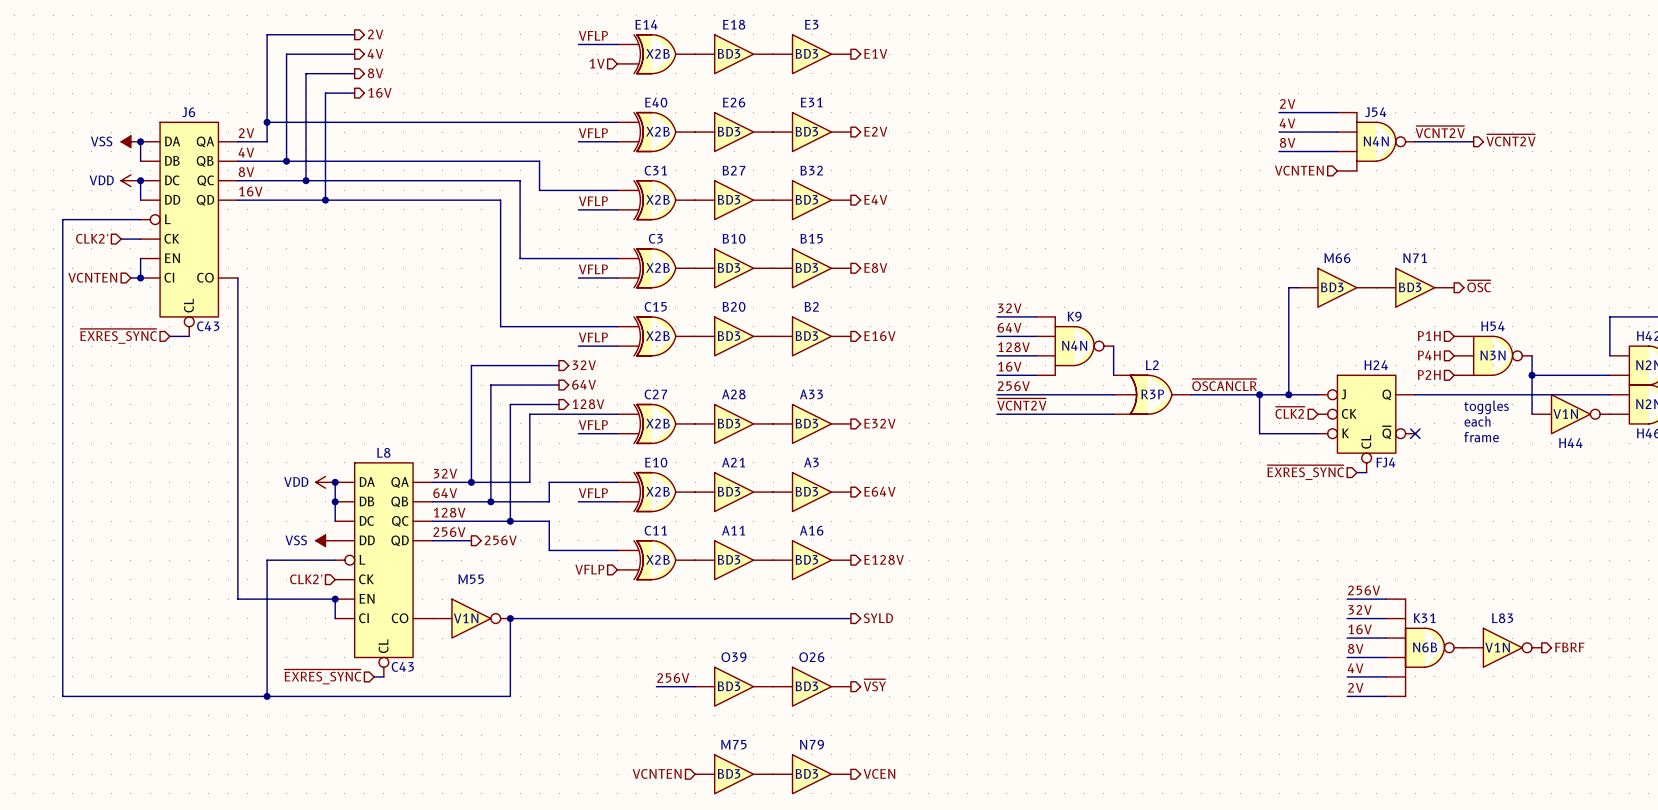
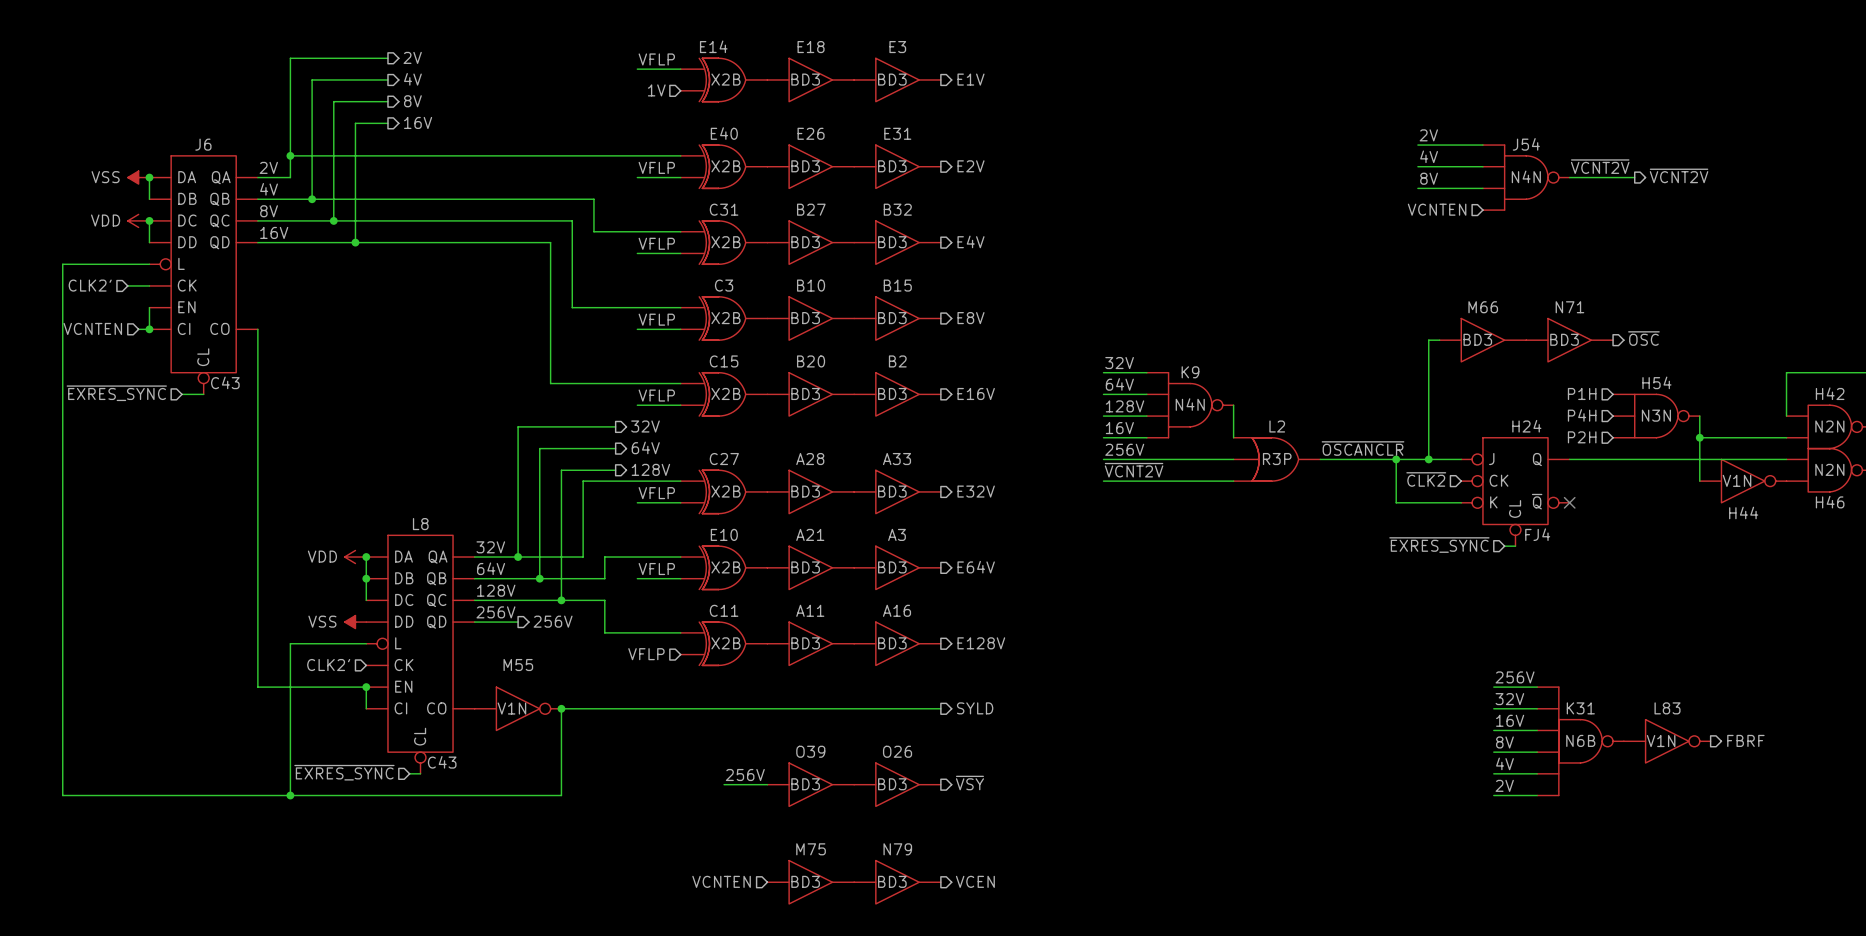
text: toggles (1486, 407) -> none
text: each (1477, 421) -> none
text: frame (1481, 437) -> none

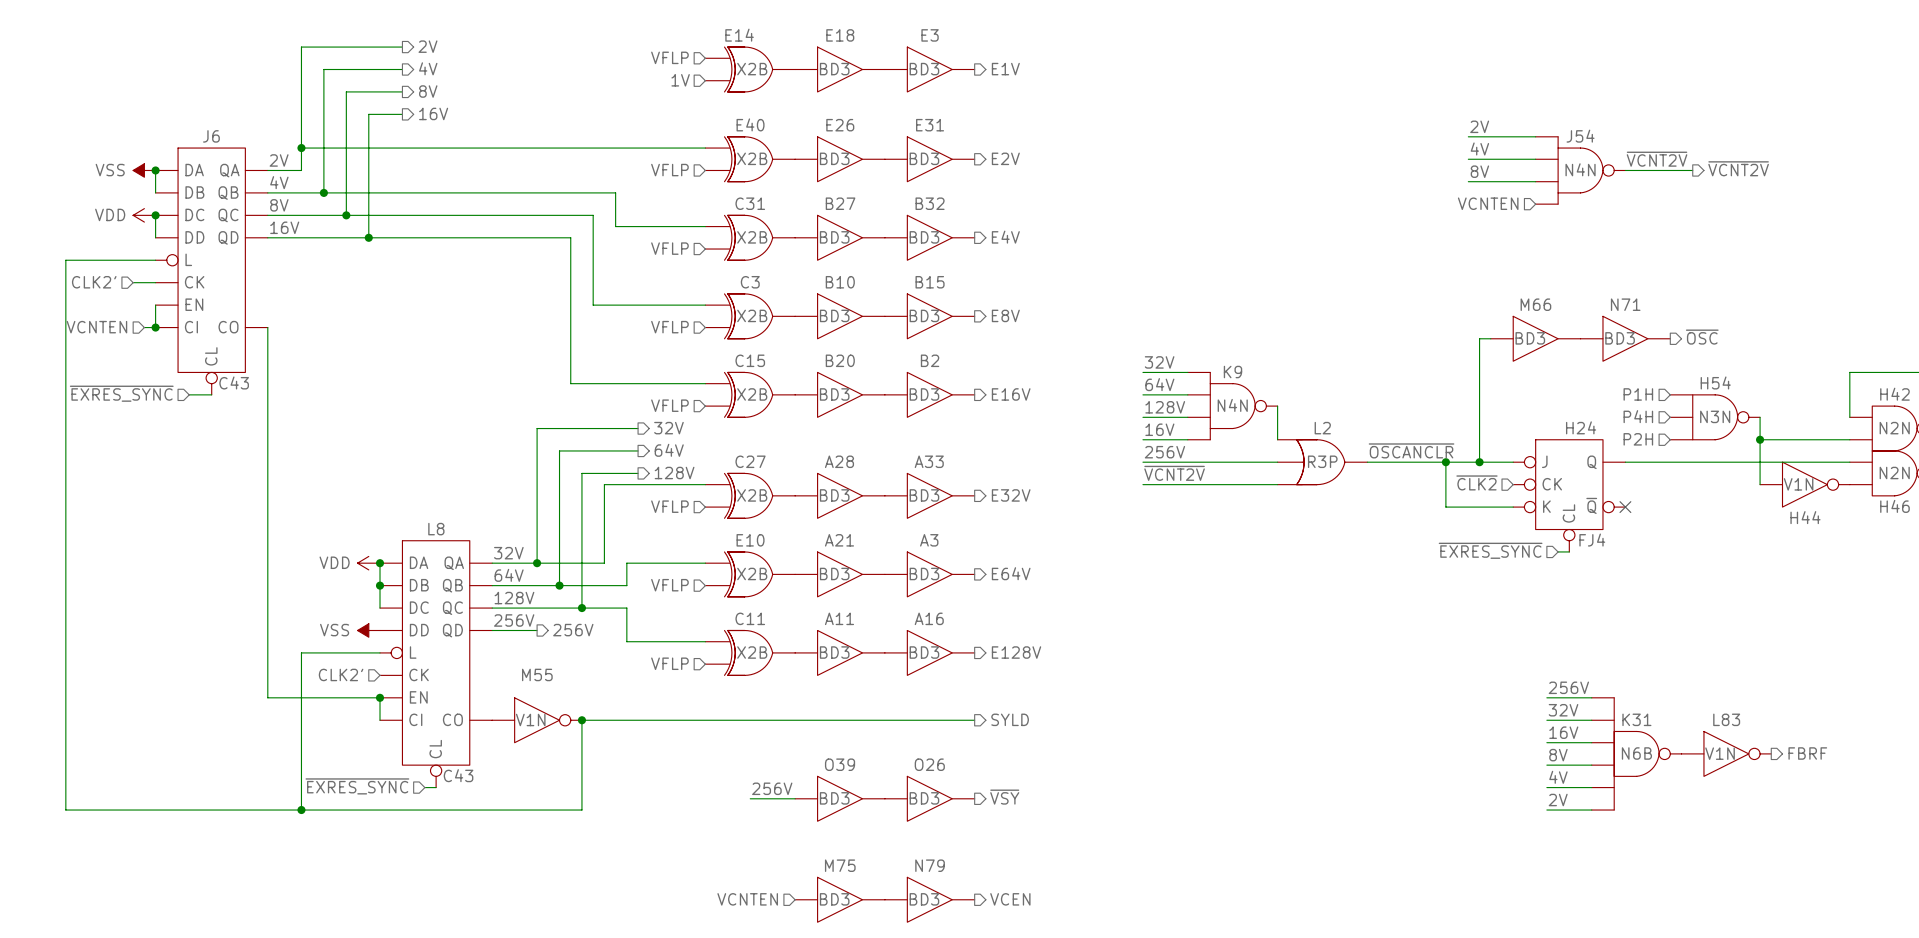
label: VFLP (656, 59) -> none
hierarchical label: none -> VFLP (669, 57)
wire: (637, 69) (680, 69) -> none
label: VFLP (656, 167) -> none
wire: (637, 177) (680, 177) -> none
hierarchical label: none -> VFLP (669, 170)
label: VFLP (656, 243) -> none
wire: (637, 253) (680, 253) -> none
hierarchical label: none -> VFLP (669, 248)
label: VFLP (656, 319) -> none
hierarchical label: none -> VFLP (669, 327)
wire: (637, 329) (680, 329) -> none
label: VFLP (656, 395) -> none
hierarchical label: none -> VFLP (669, 405)
wire: (637, 405) (680, 405) -> none
label: VFLP (656, 493) -> none
wire: (637, 502) (680, 502) -> none
hierarchical label: none -> VFLP (669, 506)
label: VFLP (656, 569) -> none
wire: (637, 578) (680, 578) -> none
hierarchical label: none -> VFLP (669, 585)

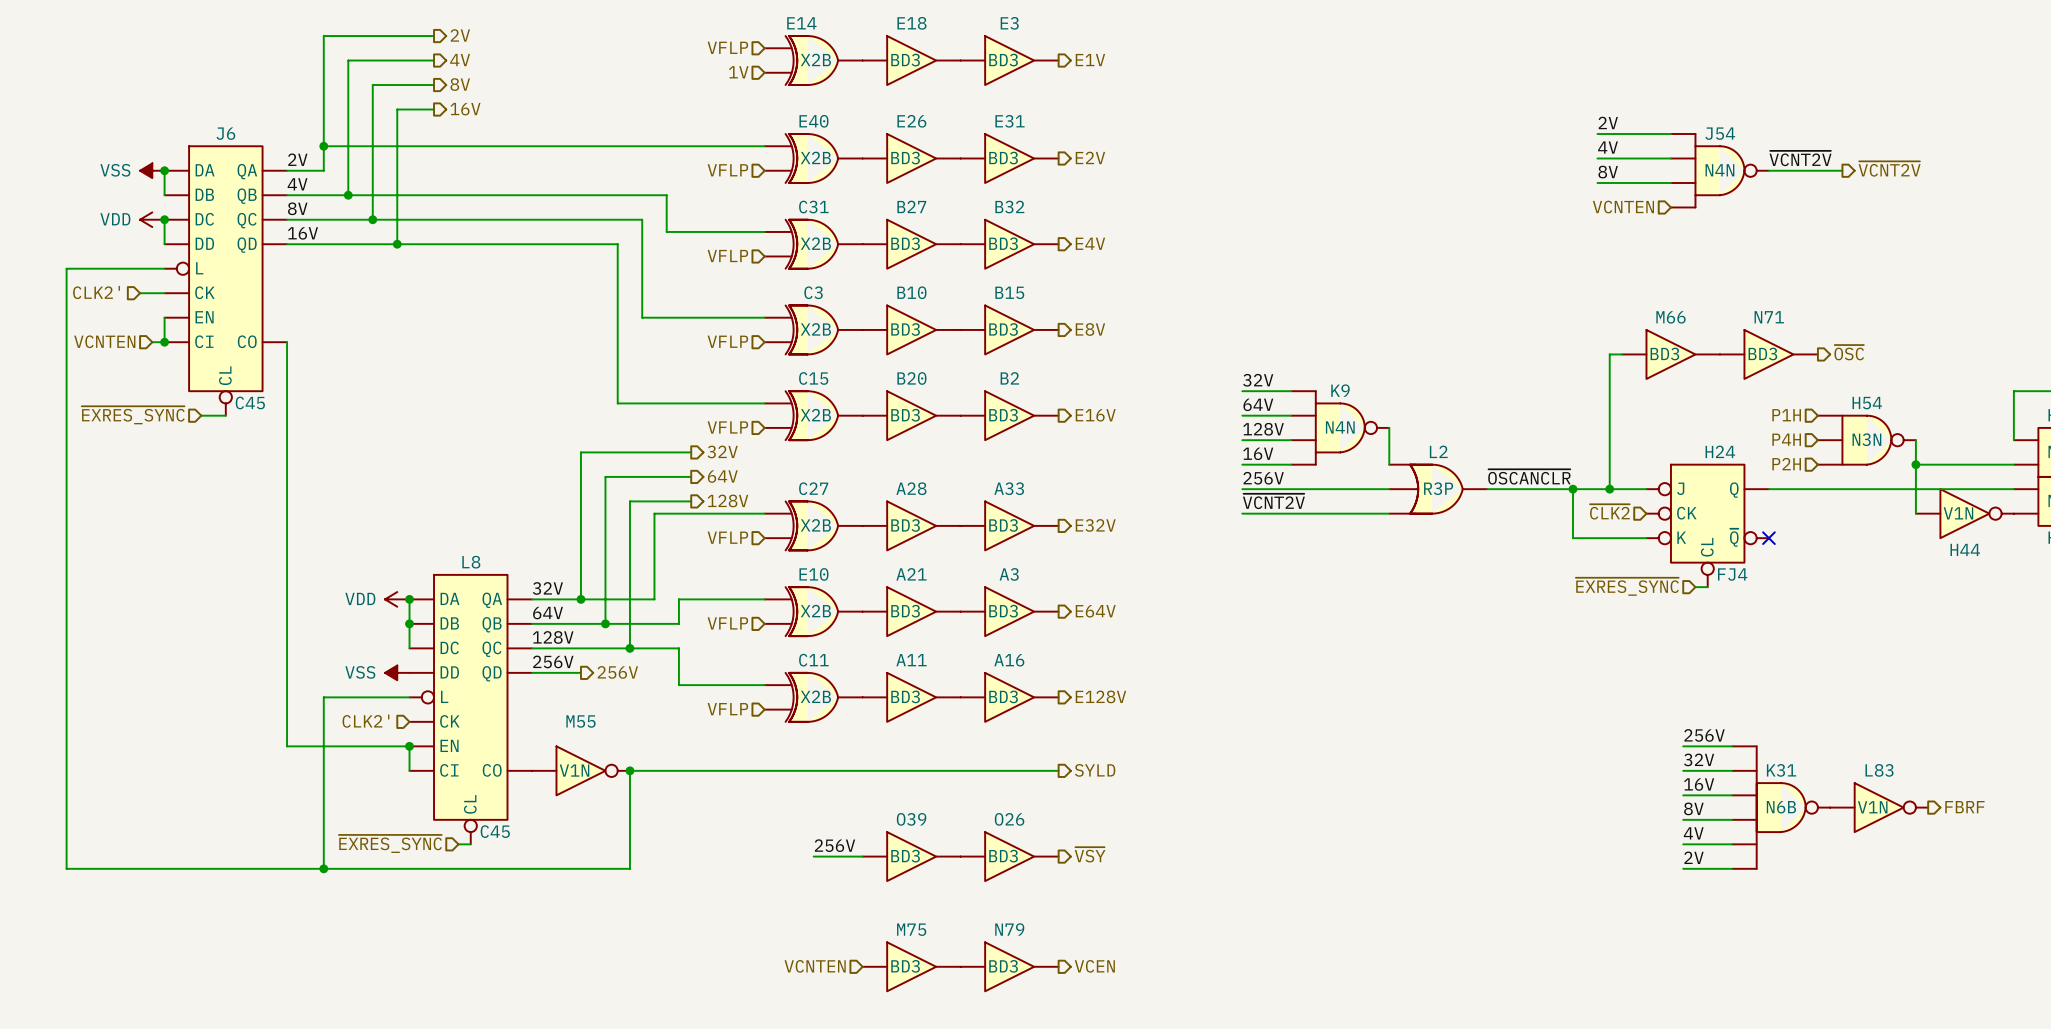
J6 value: C43 (234, 382) -> C45 (250, 402)
L8 value: C43 (458, 775) -> C45 (495, 831)

